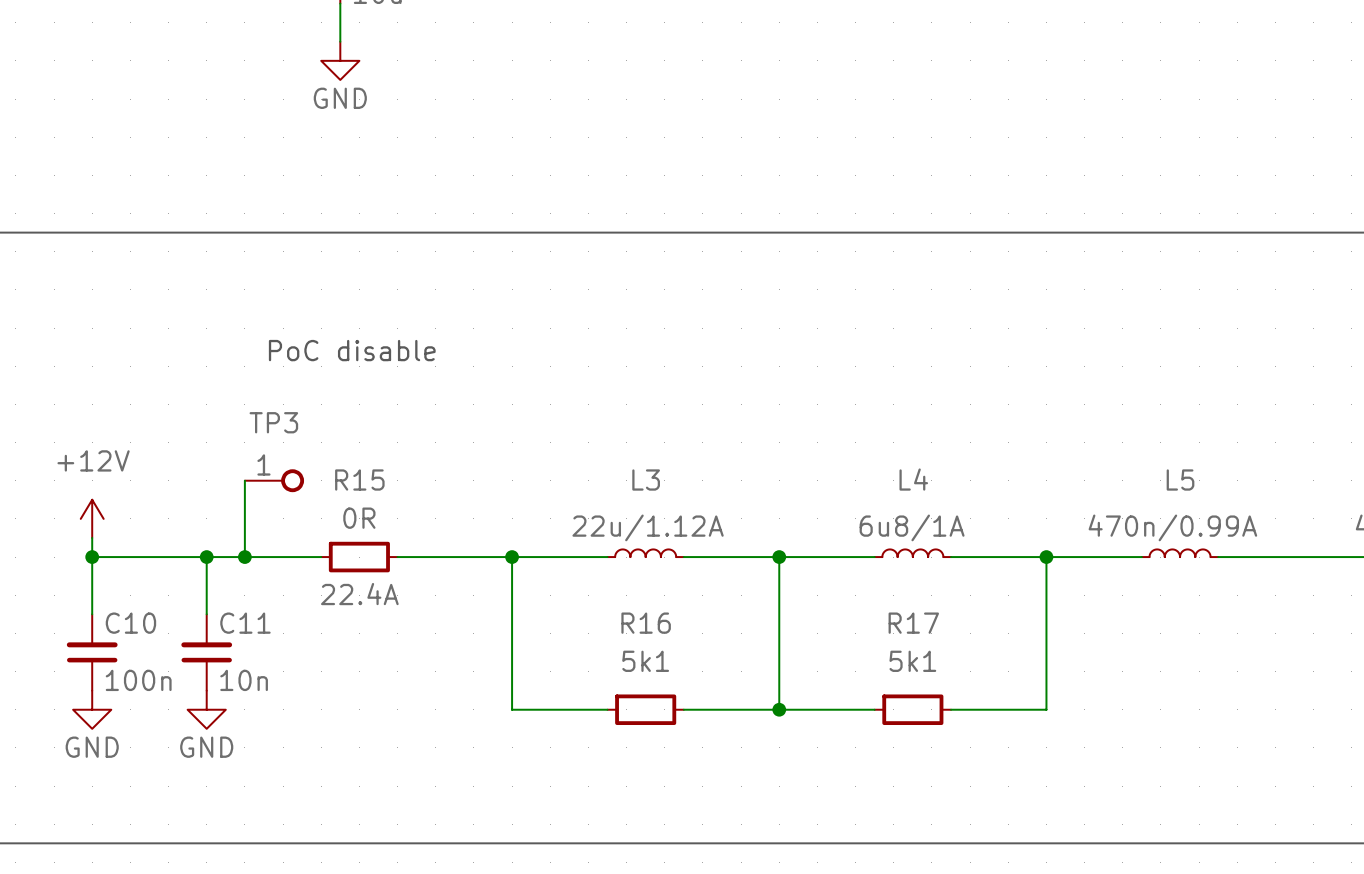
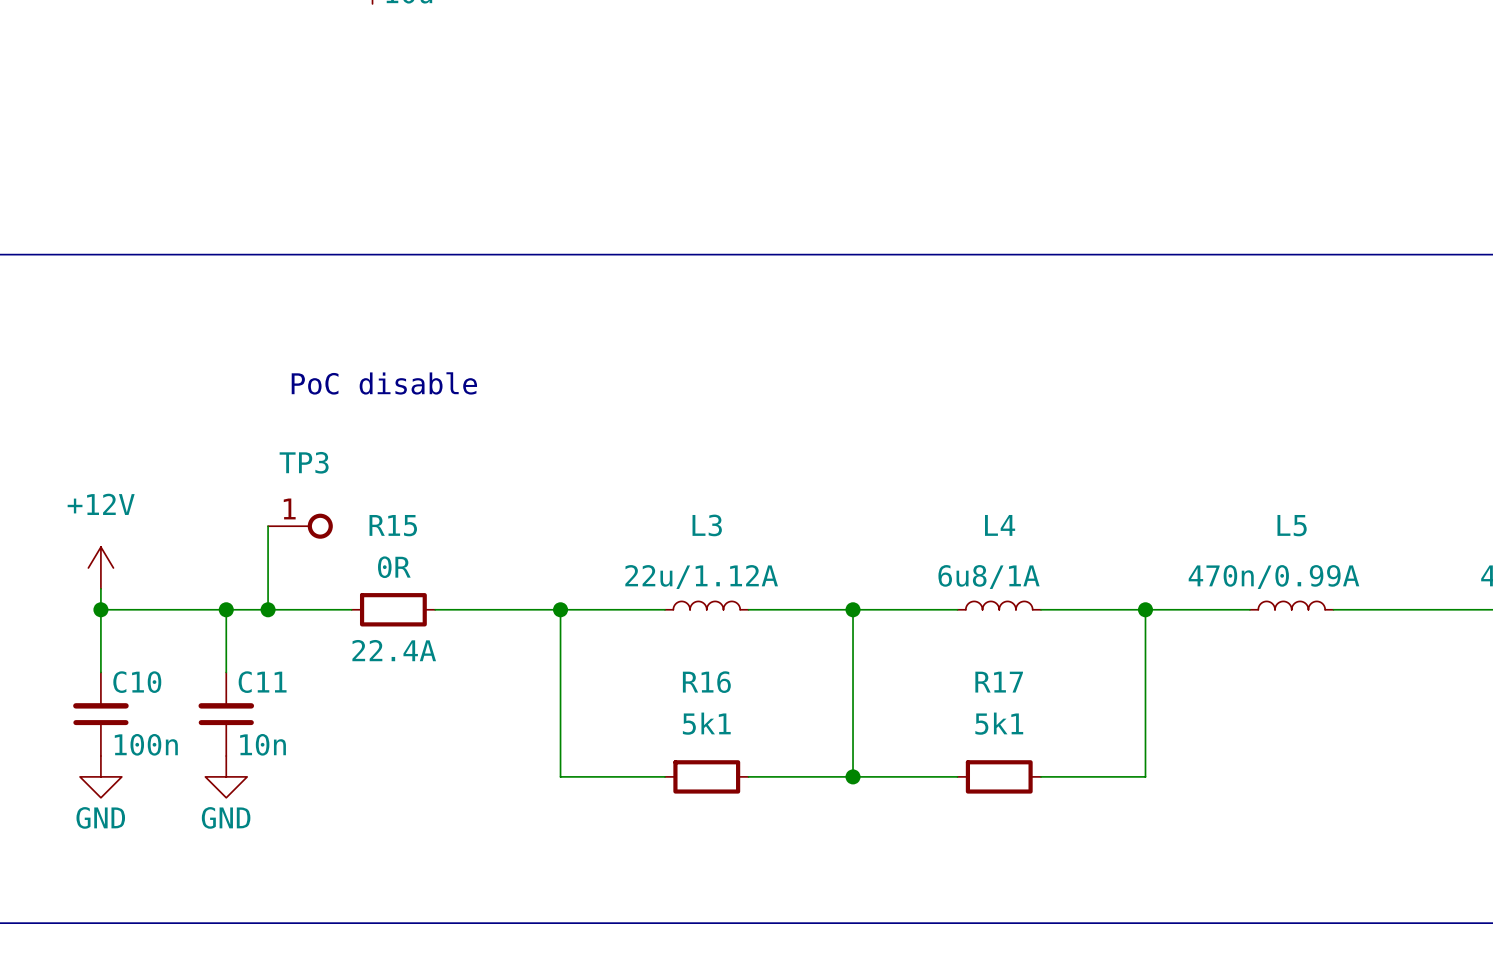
wire: (340, 3) (340, 41) -> none
power symbol: GND (340, 60) -> none

